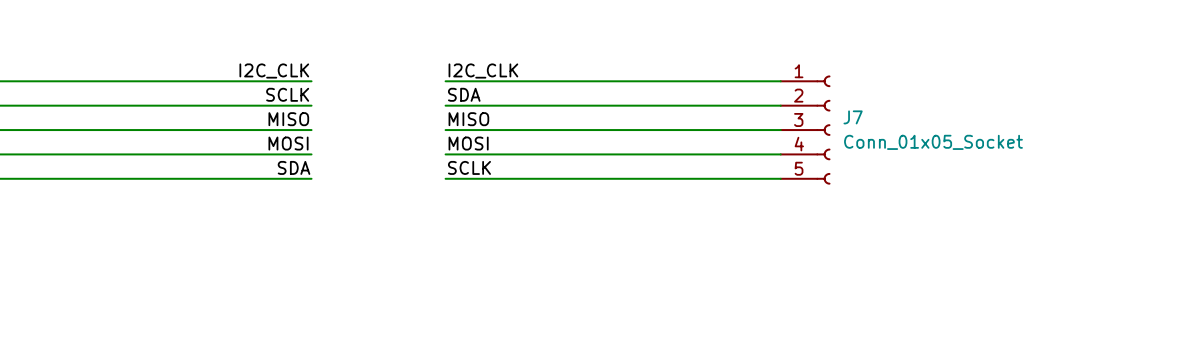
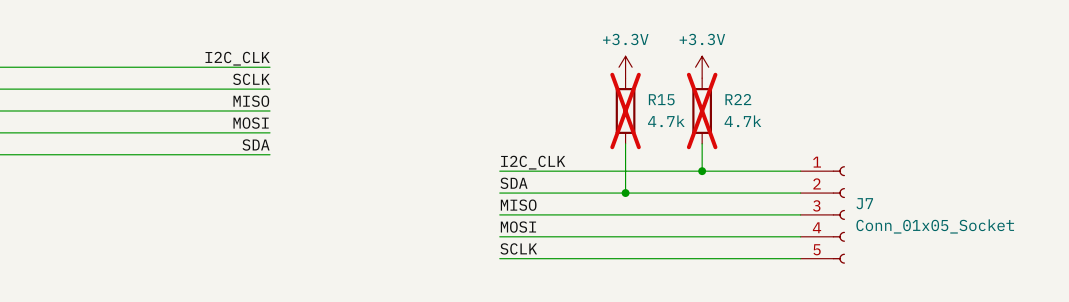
label position: I2C_CLK (483, 71) -> I2C_CLK (533, 162)
wire: (445, 81) (780, 81) -> (499, 171) (800, 171)
power symbol: none -> +3.3V (625, 67)
power symbol: none -> +3.3V (702, 67)
label position: SDA (464, 94) -> SDA (513, 183)
wire: (445, 105) (780, 105) -> (499, 193) (800, 193)
label position: MISO (468, 119) -> MISO (518, 205)
wire: (445, 130) (780, 130) -> (499, 214) (800, 214)
R15: none -> 4.7k (625, 110)
R22: none -> 4.7k (702, 110)
J7 position: (805, 130) -> (822, 214)
label position: MOSI (468, 143) -> MOSI (518, 227)
wire: (445, 154) (780, 154) -> (499, 236) (800, 236)
wire: none -> (625, 143) (625, 193)
wire: none -> (702, 143) (702, 171)
label position: SCLK (469, 167) -> SCLK (518, 248)
wire: (445, 178) (780, 178) -> (499, 258) (800, 258)
junction: none -> (702, 171)
junction: none -> (625, 193)

